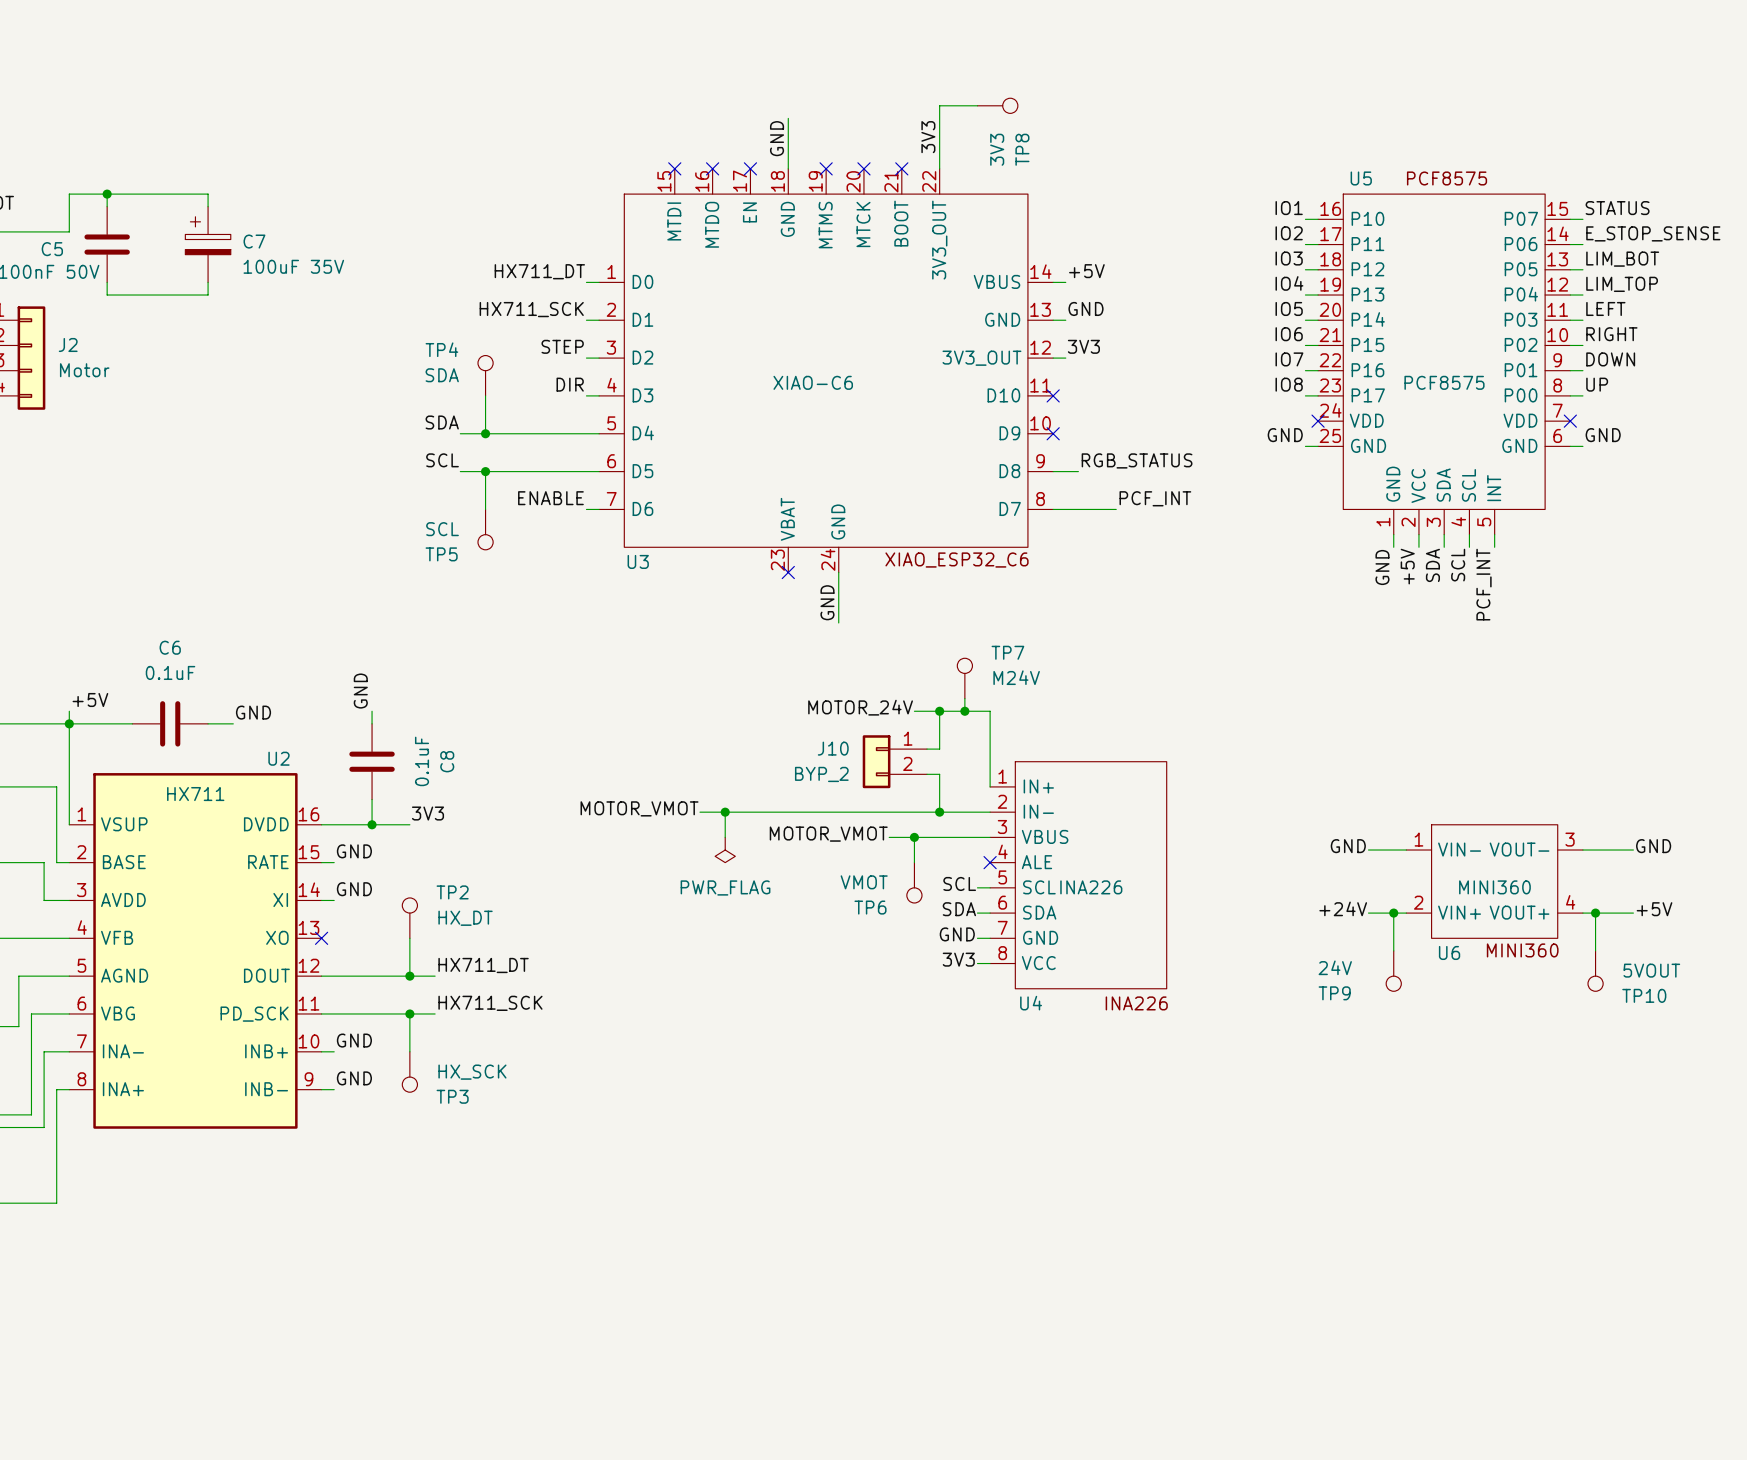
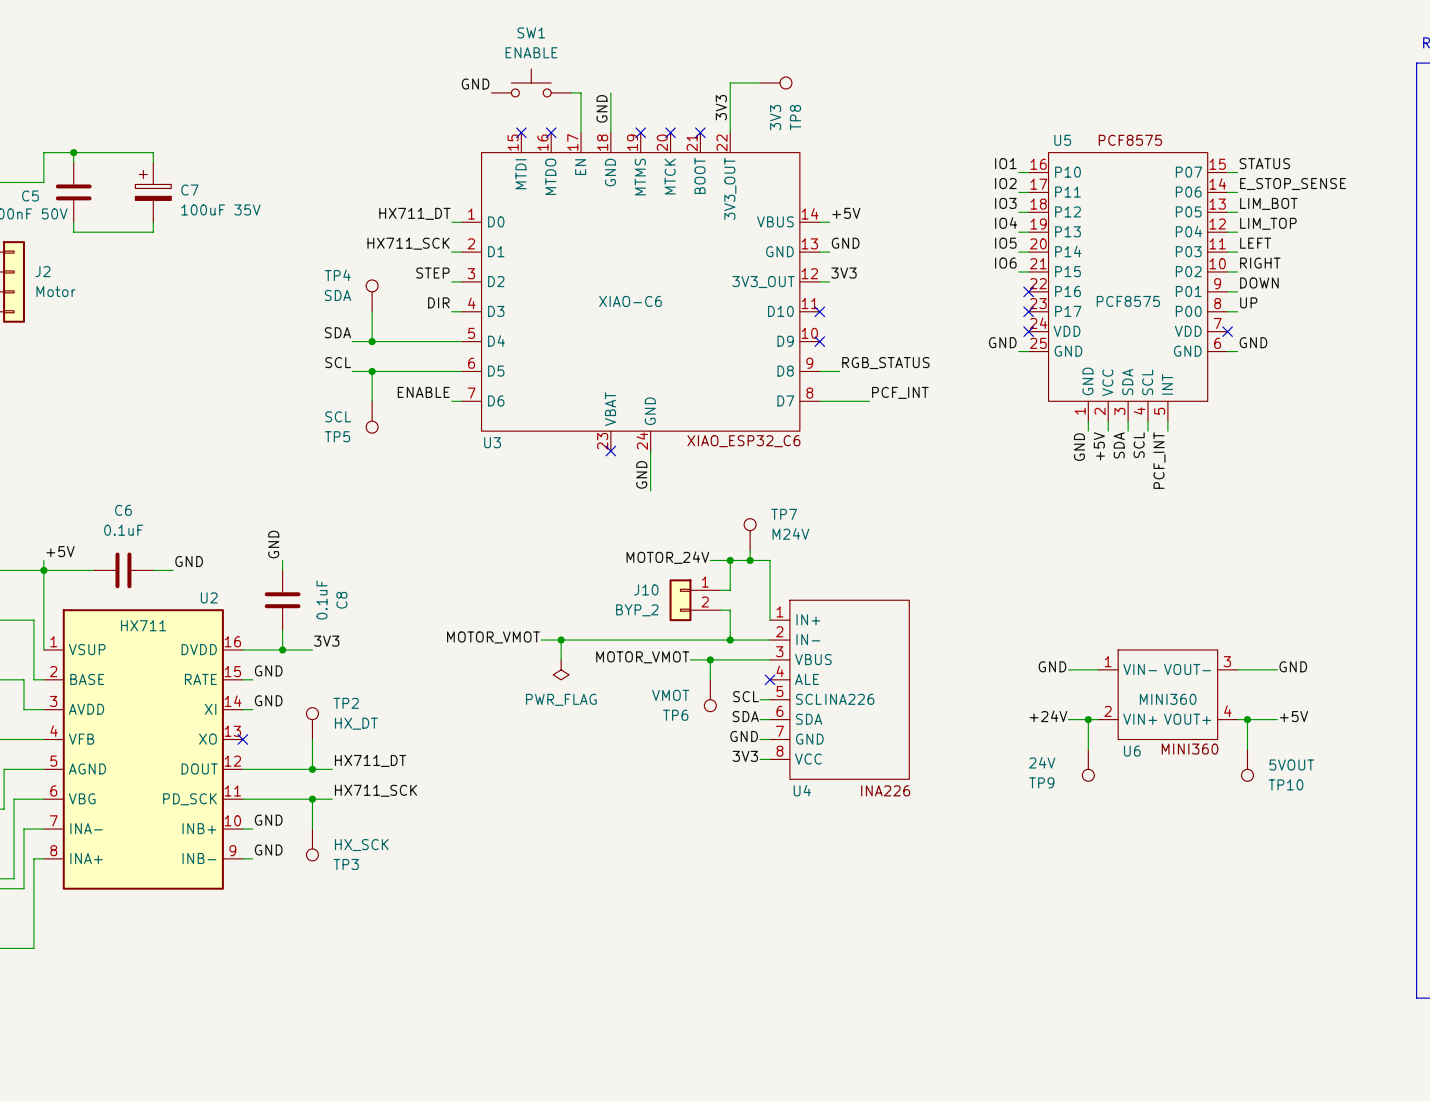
SW1: none -> ENABLE (531, 82)
label: none -> GND (475, 84)
wire: none -> (571, 92) (581, 92) (581, 132)
no-connect mark: (750, 168) -> none
label: IO7 (1289, 359) -> none
wire: (1305, 370) (1318, 370) -> none
no-connect mark: none -> (1028, 291)
label: IO8 (1289, 384) -> none
wire: (1305, 395) (1318, 395) -> none
no-connect mark: none -> (1028, 311)

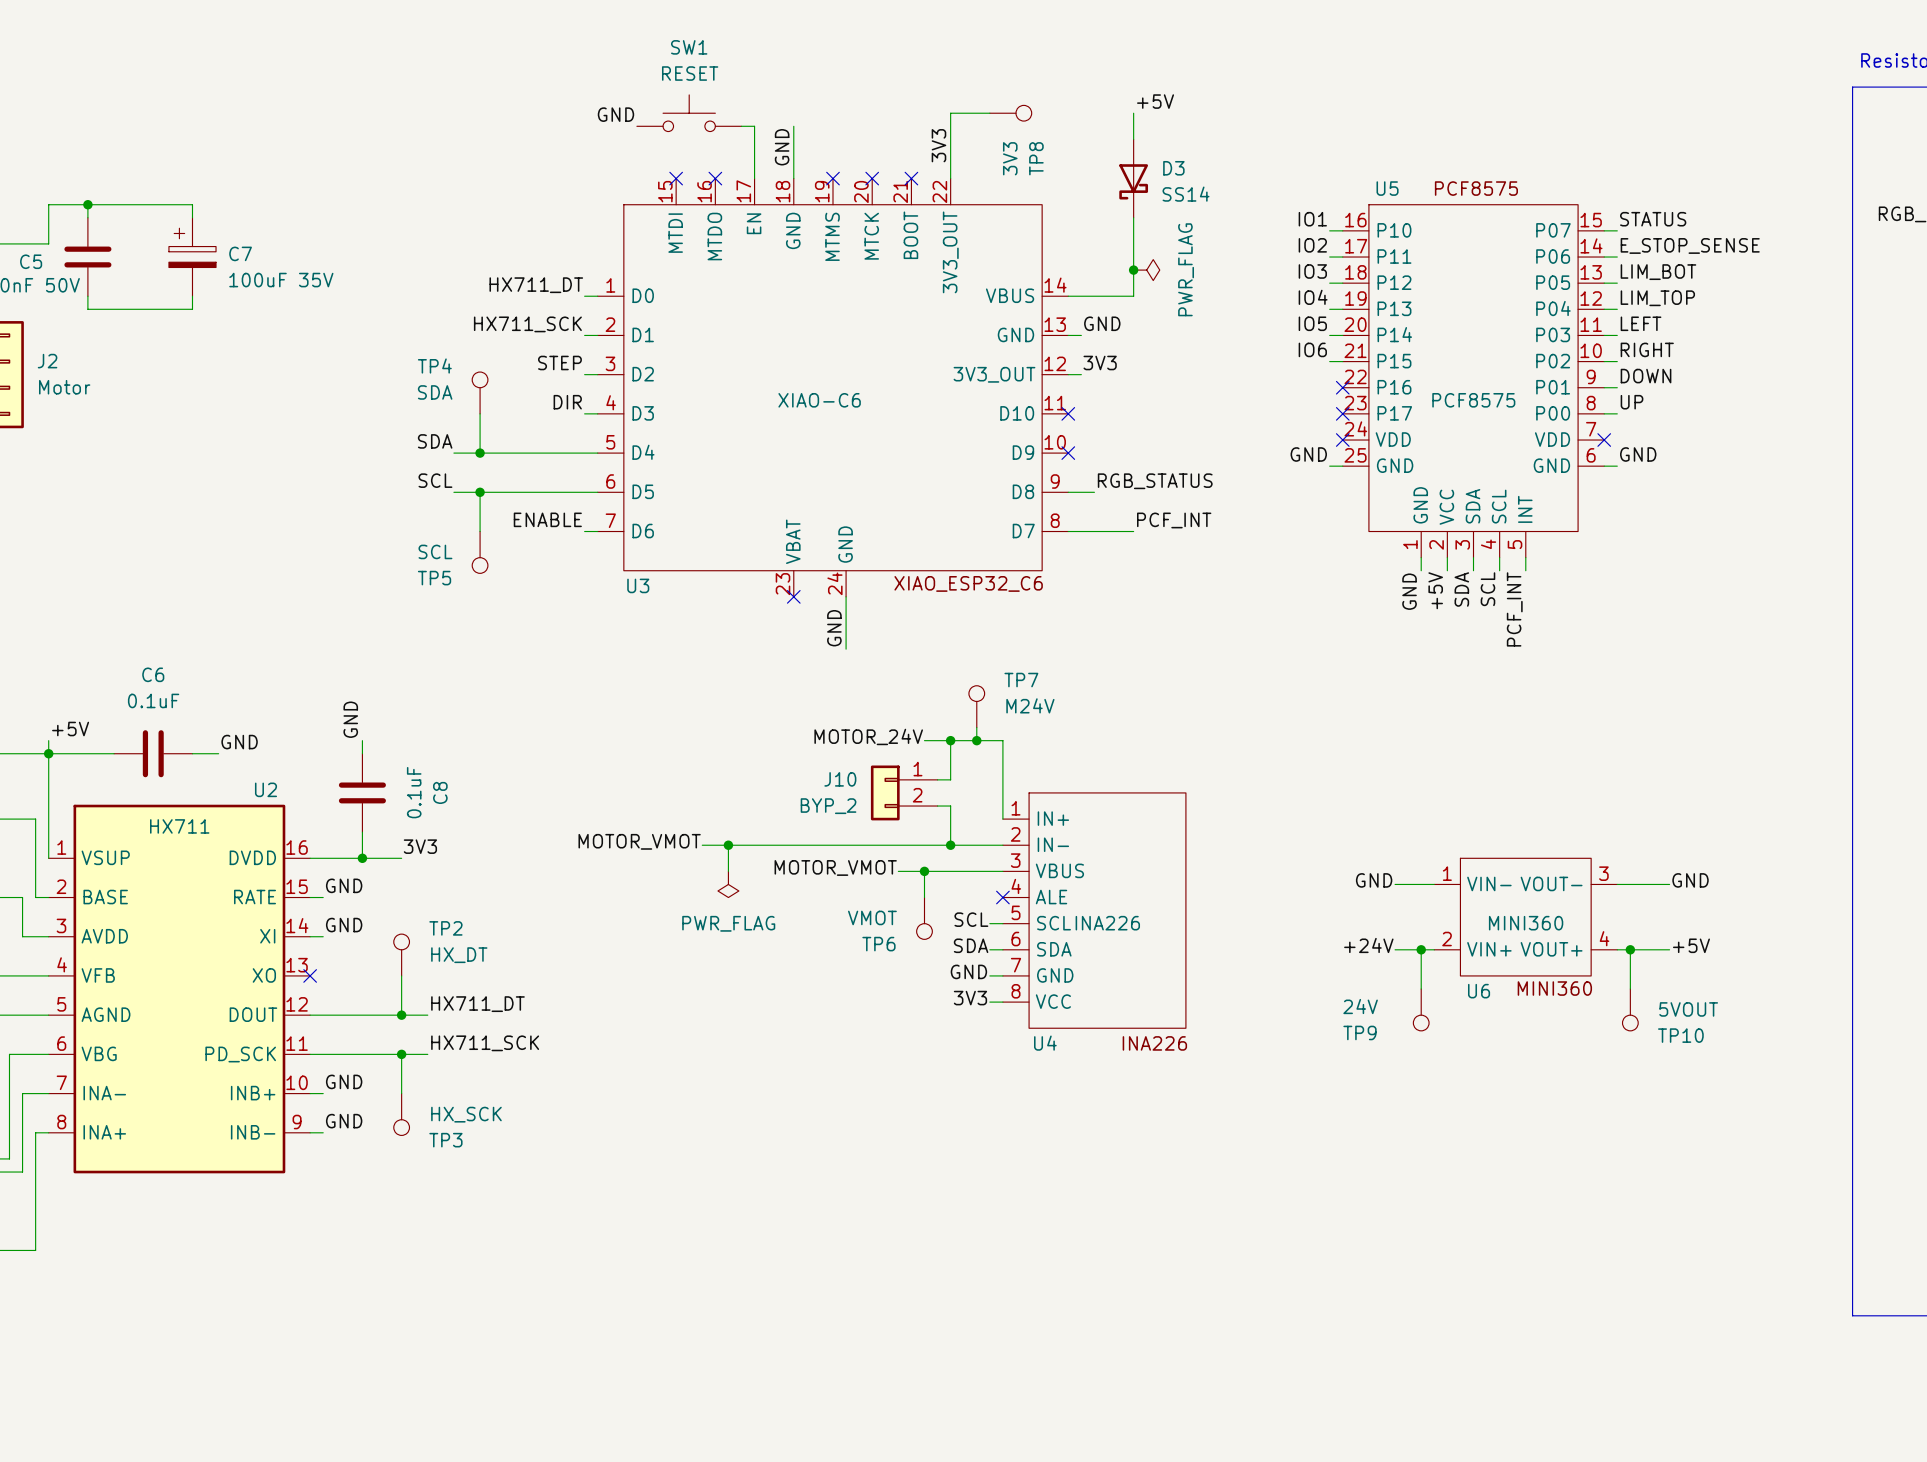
SW1 value: ENABLE (531, 52) -> RESET (690, 73)
wire: none -> (1133, 113) (1133, 139)
D3: none -> SS14 (1133, 178)
wire: none -> (1133, 217) (1133, 296) (1081, 296)
junction: none -> (1133, 270)
power symbol: none -> PWR_FLAG (1146, 270)
label position: +5V (846, 213) -> +5V (1155, 101)

